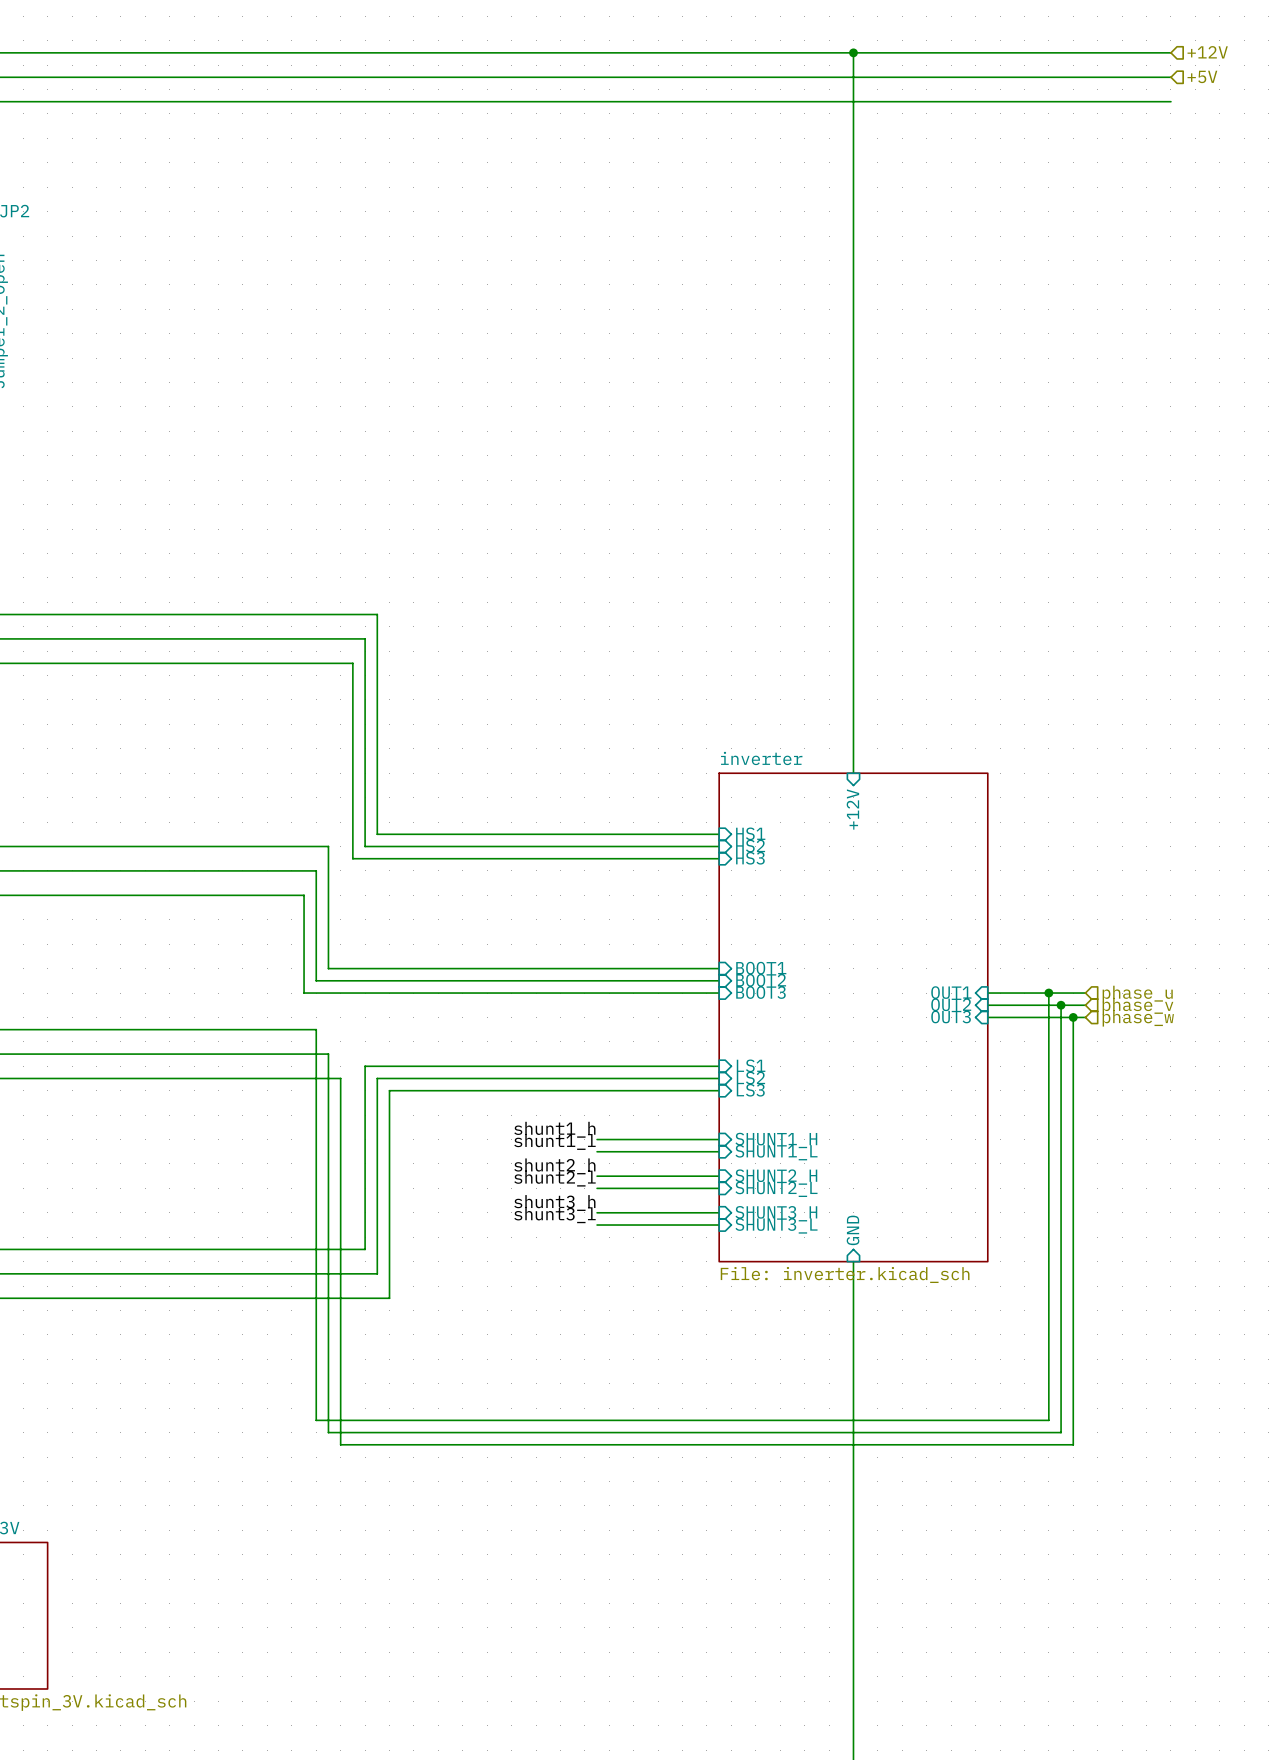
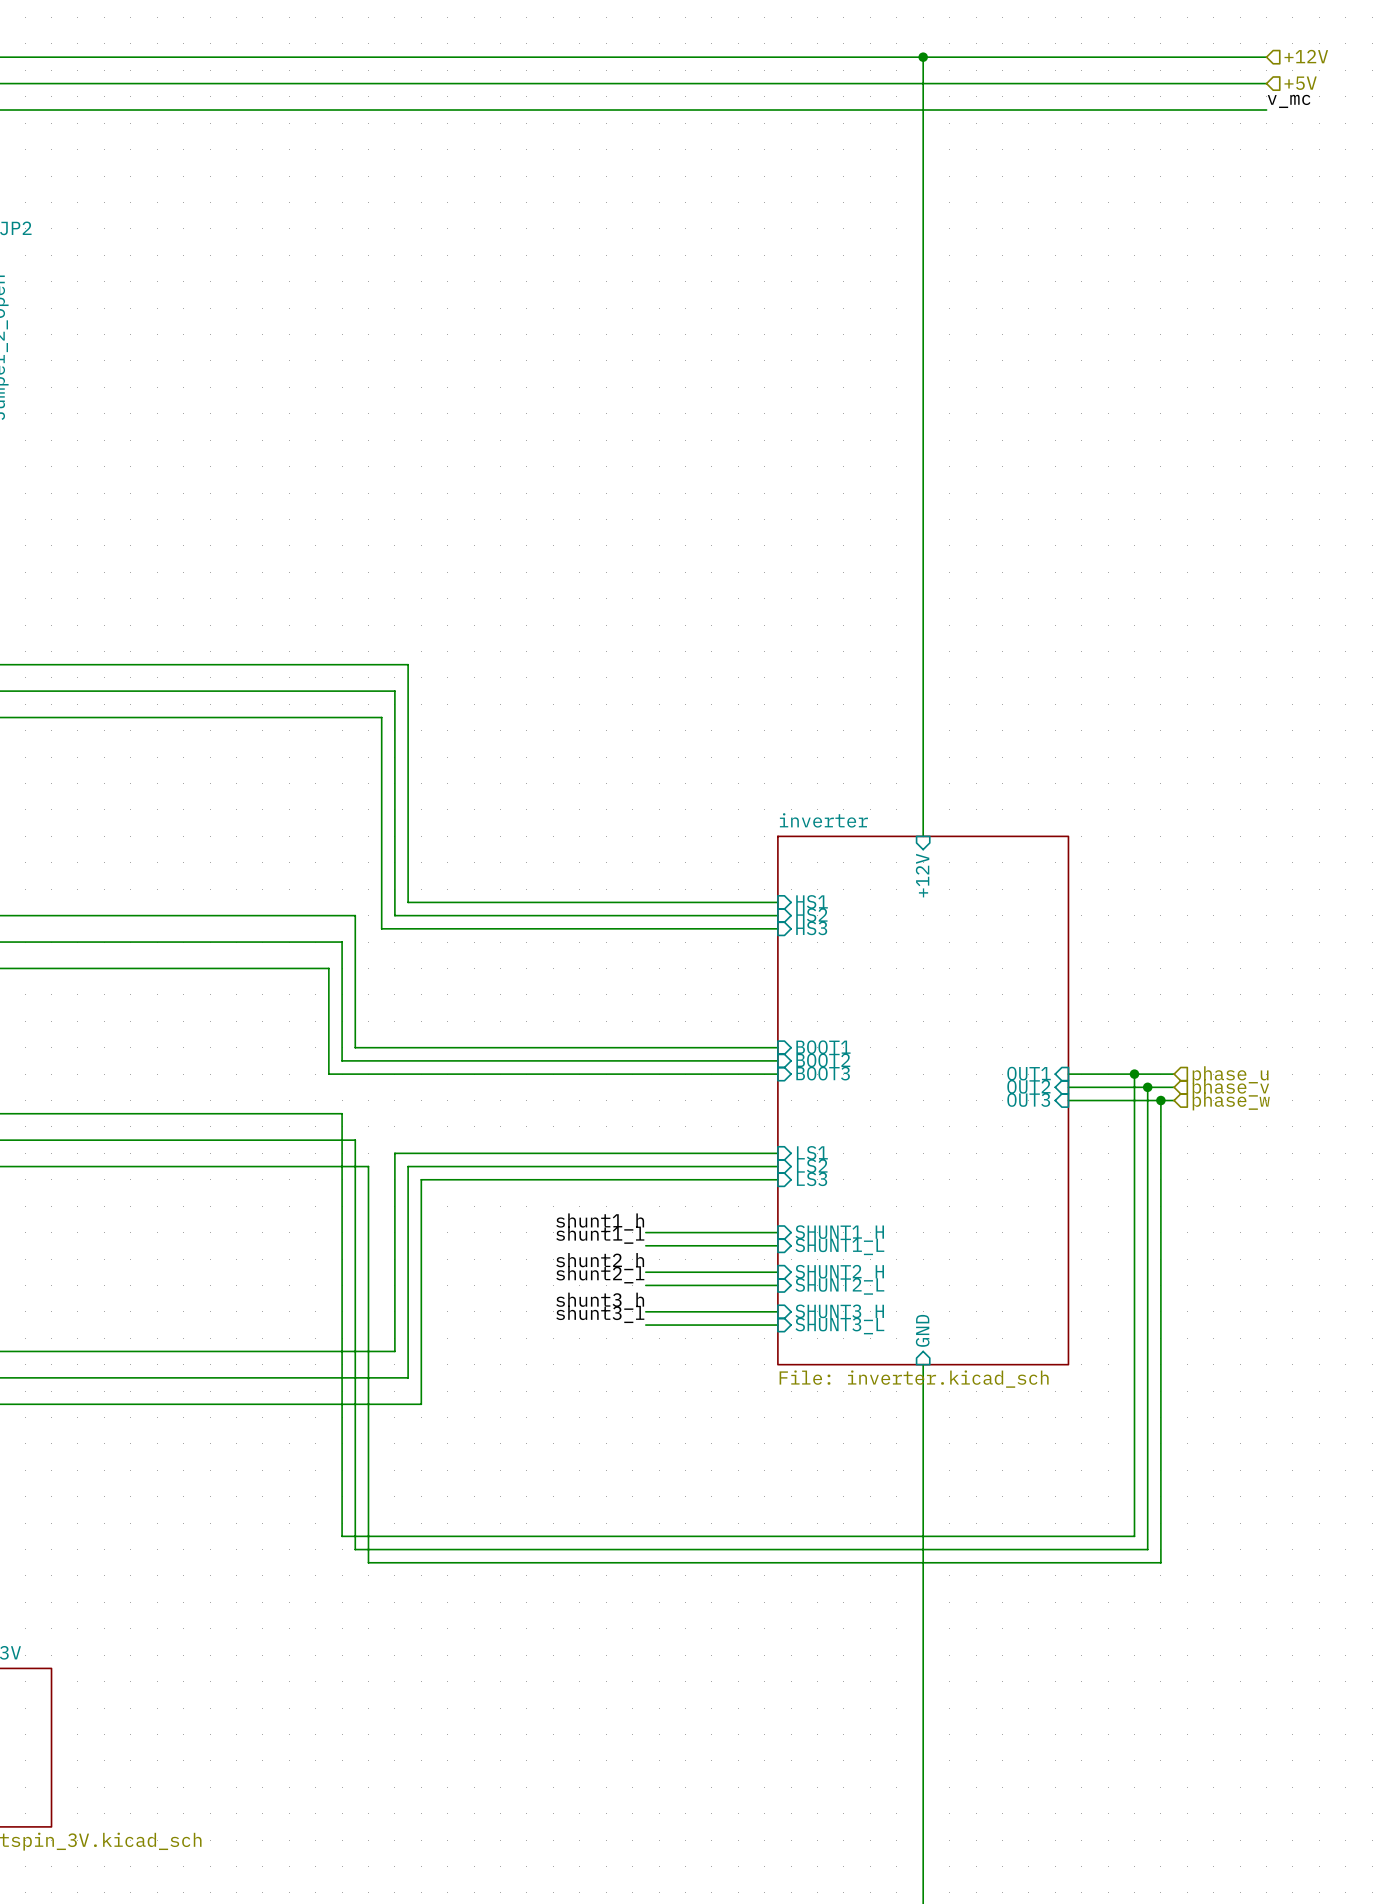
label: none -> v_mc (1289, 101)

